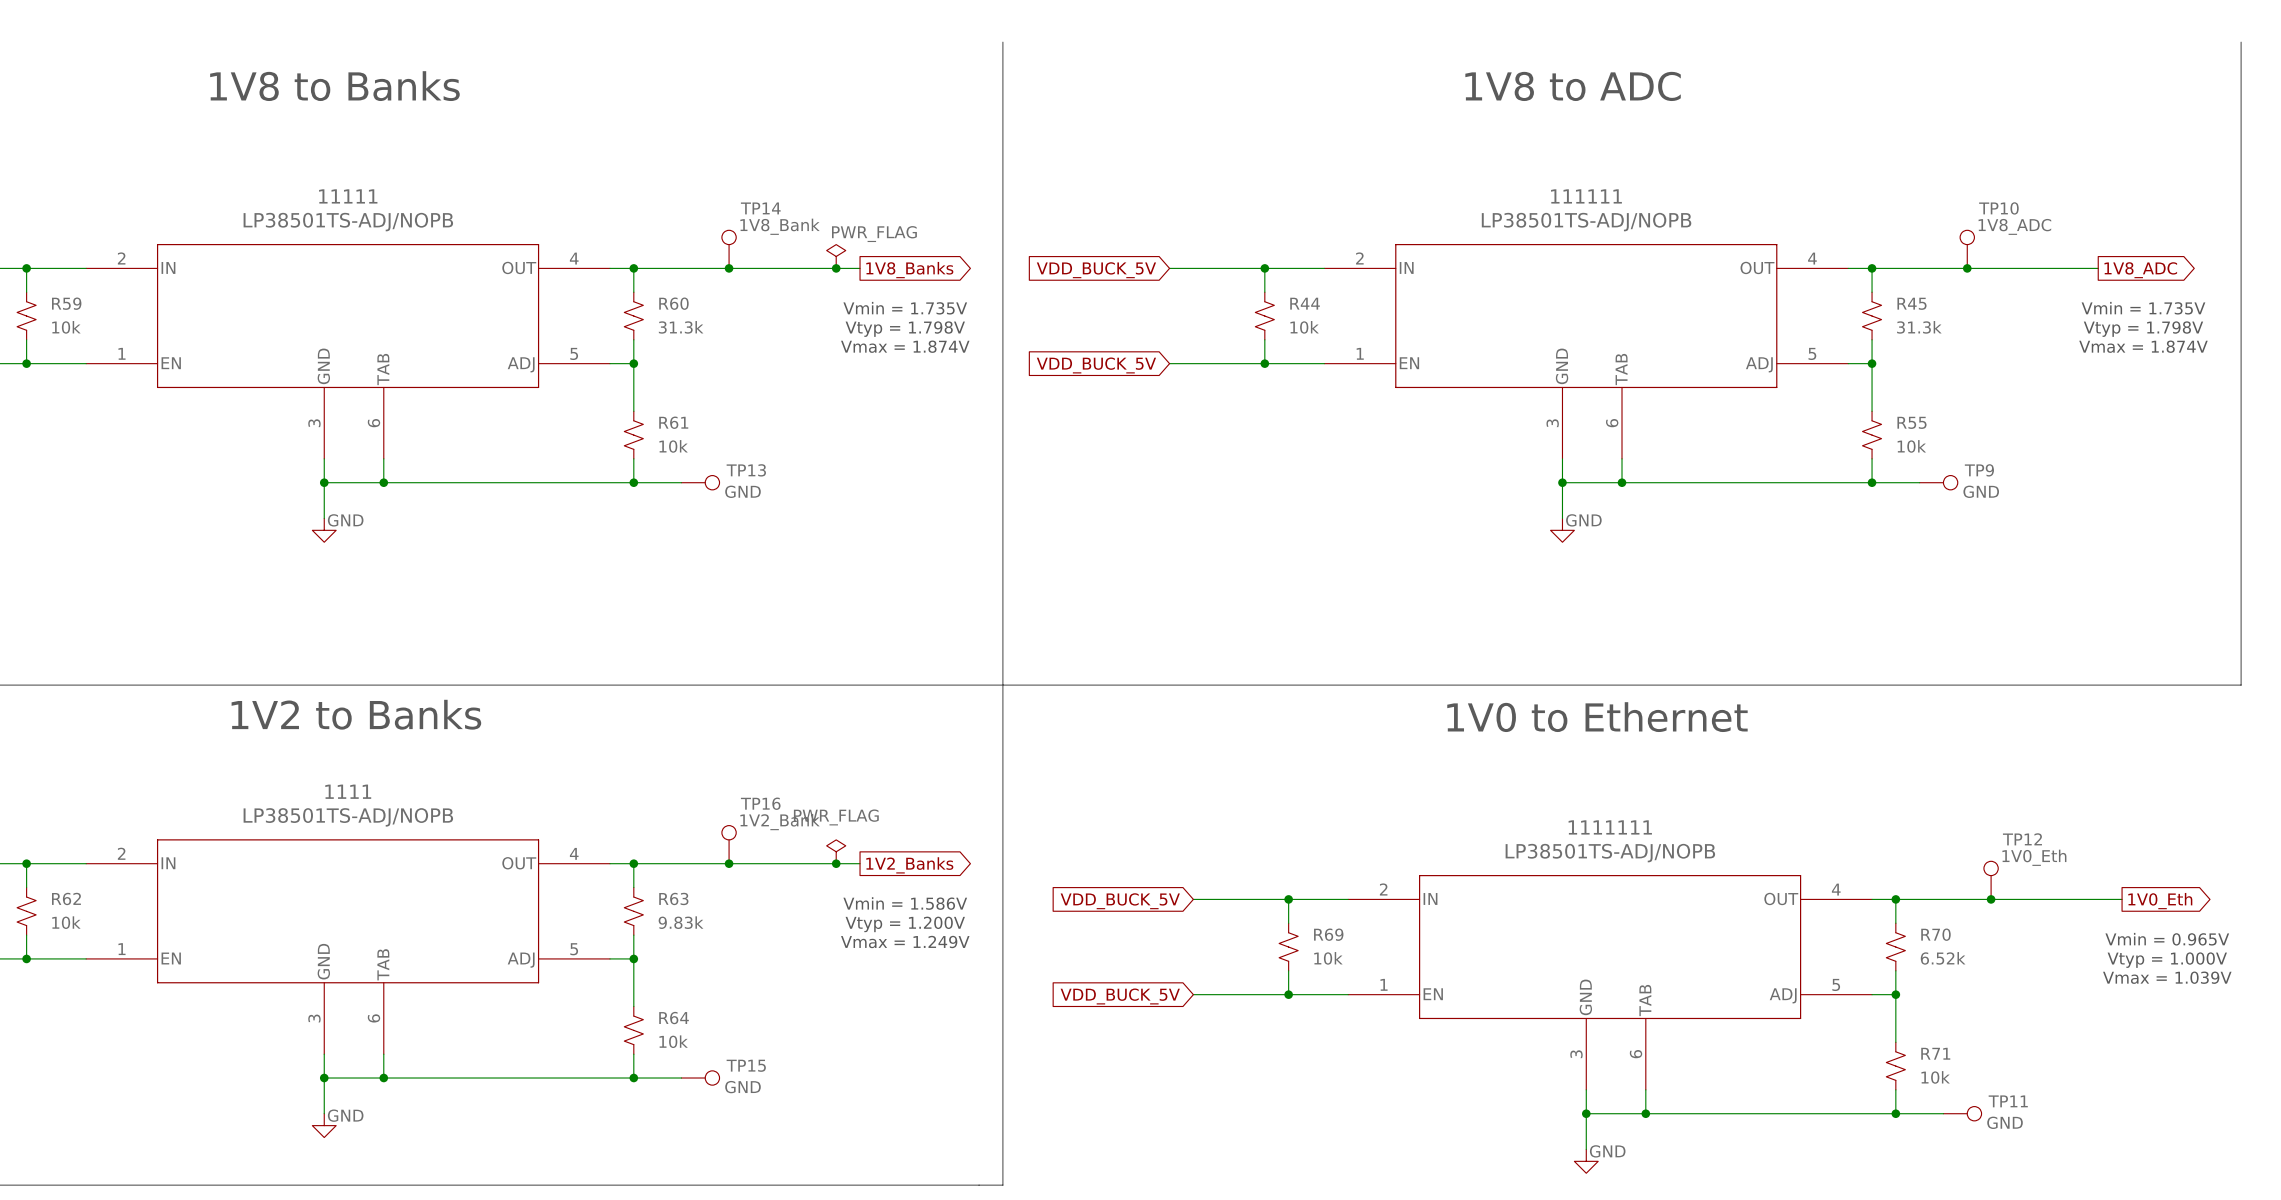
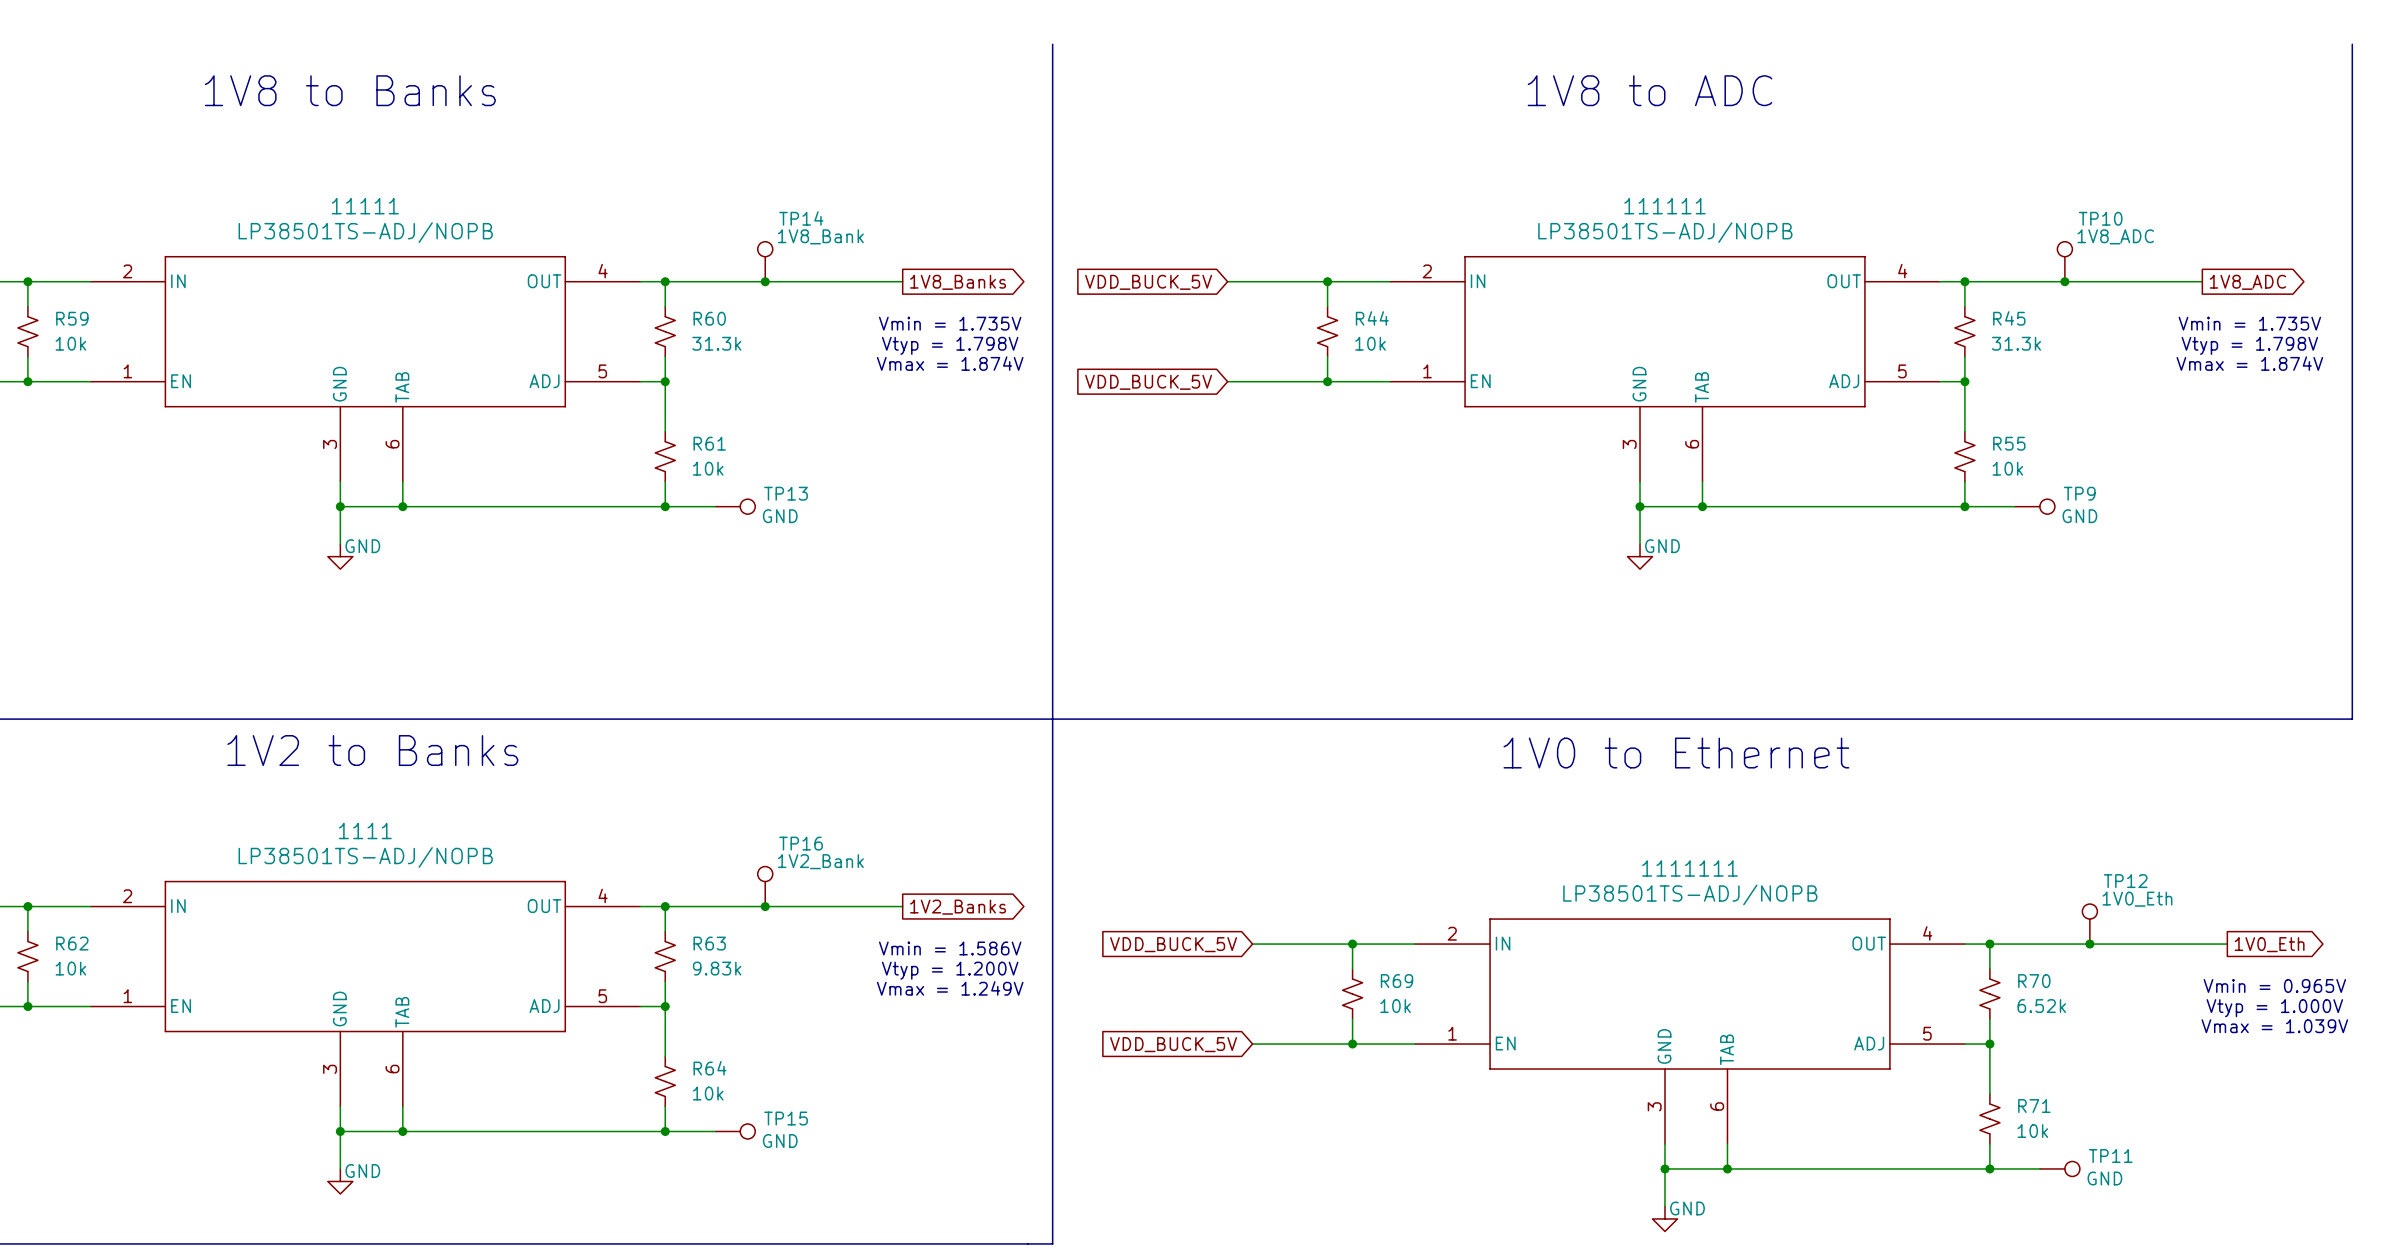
power symbol: PWR_FLAG (836, 256) -> none
junction: (836, 268) -> none
power symbol: PWR_FLAG (836, 851) -> none
junction: (836, 863) -> none

